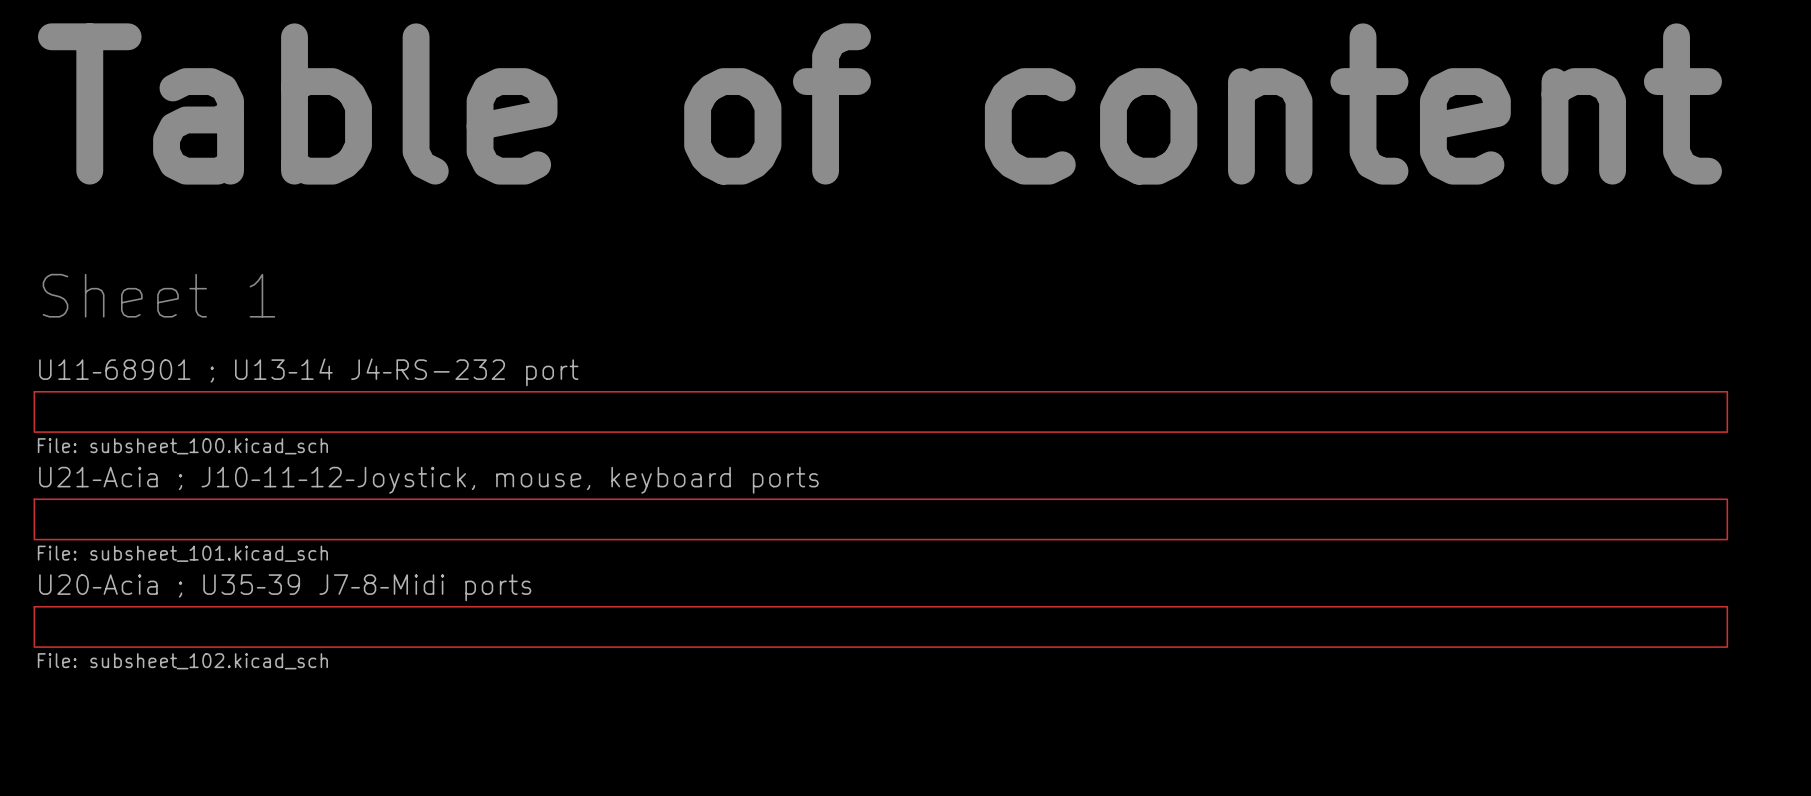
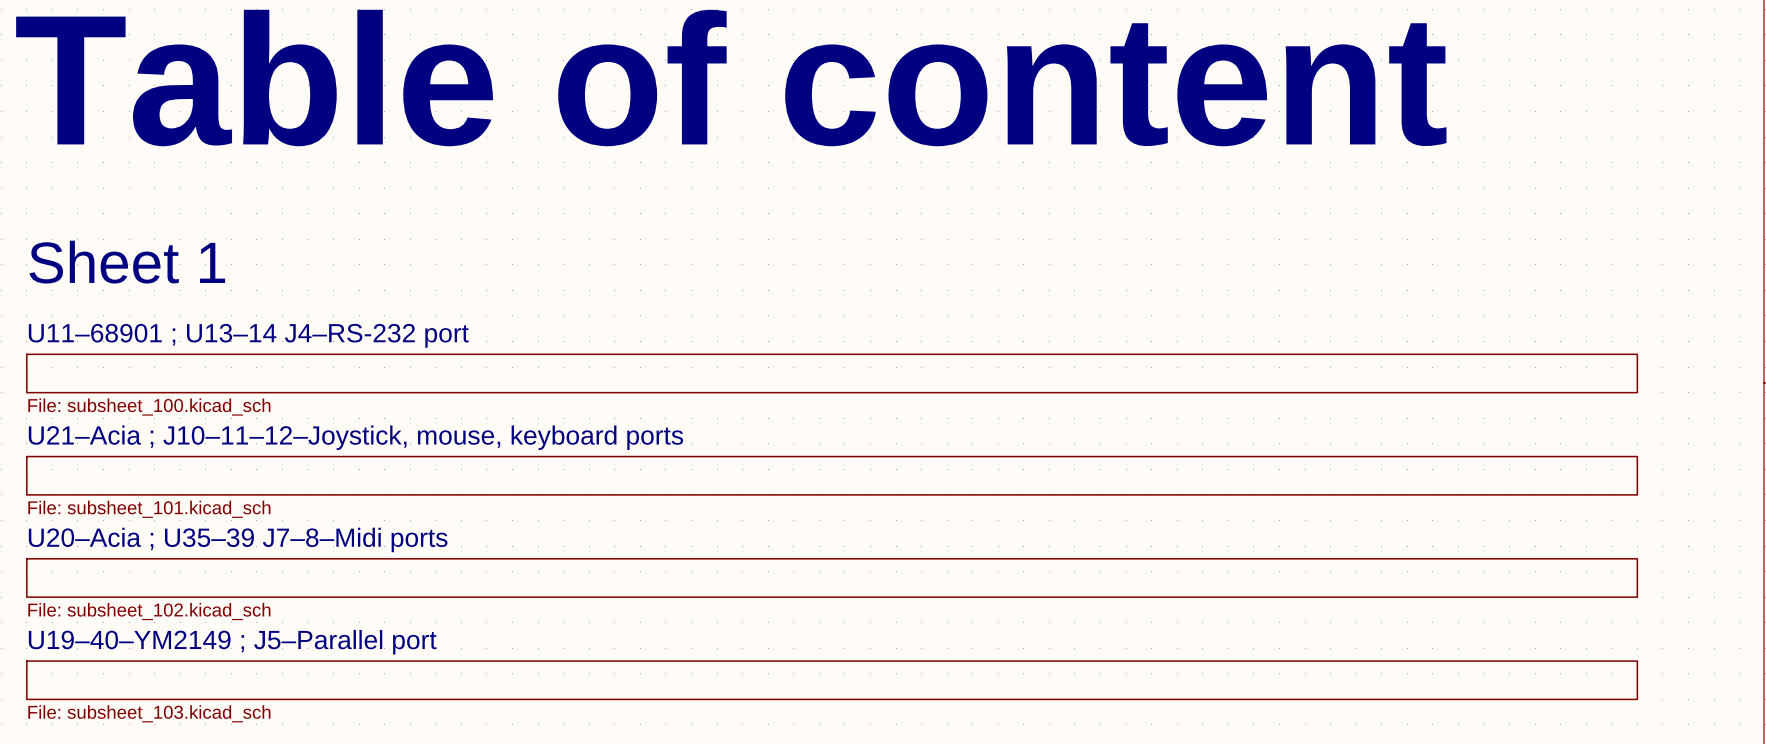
sheet U19–40–YM2149 ; J5–Parallel port: none -> File: subsheet_103.kicad_sch (832, 680)

